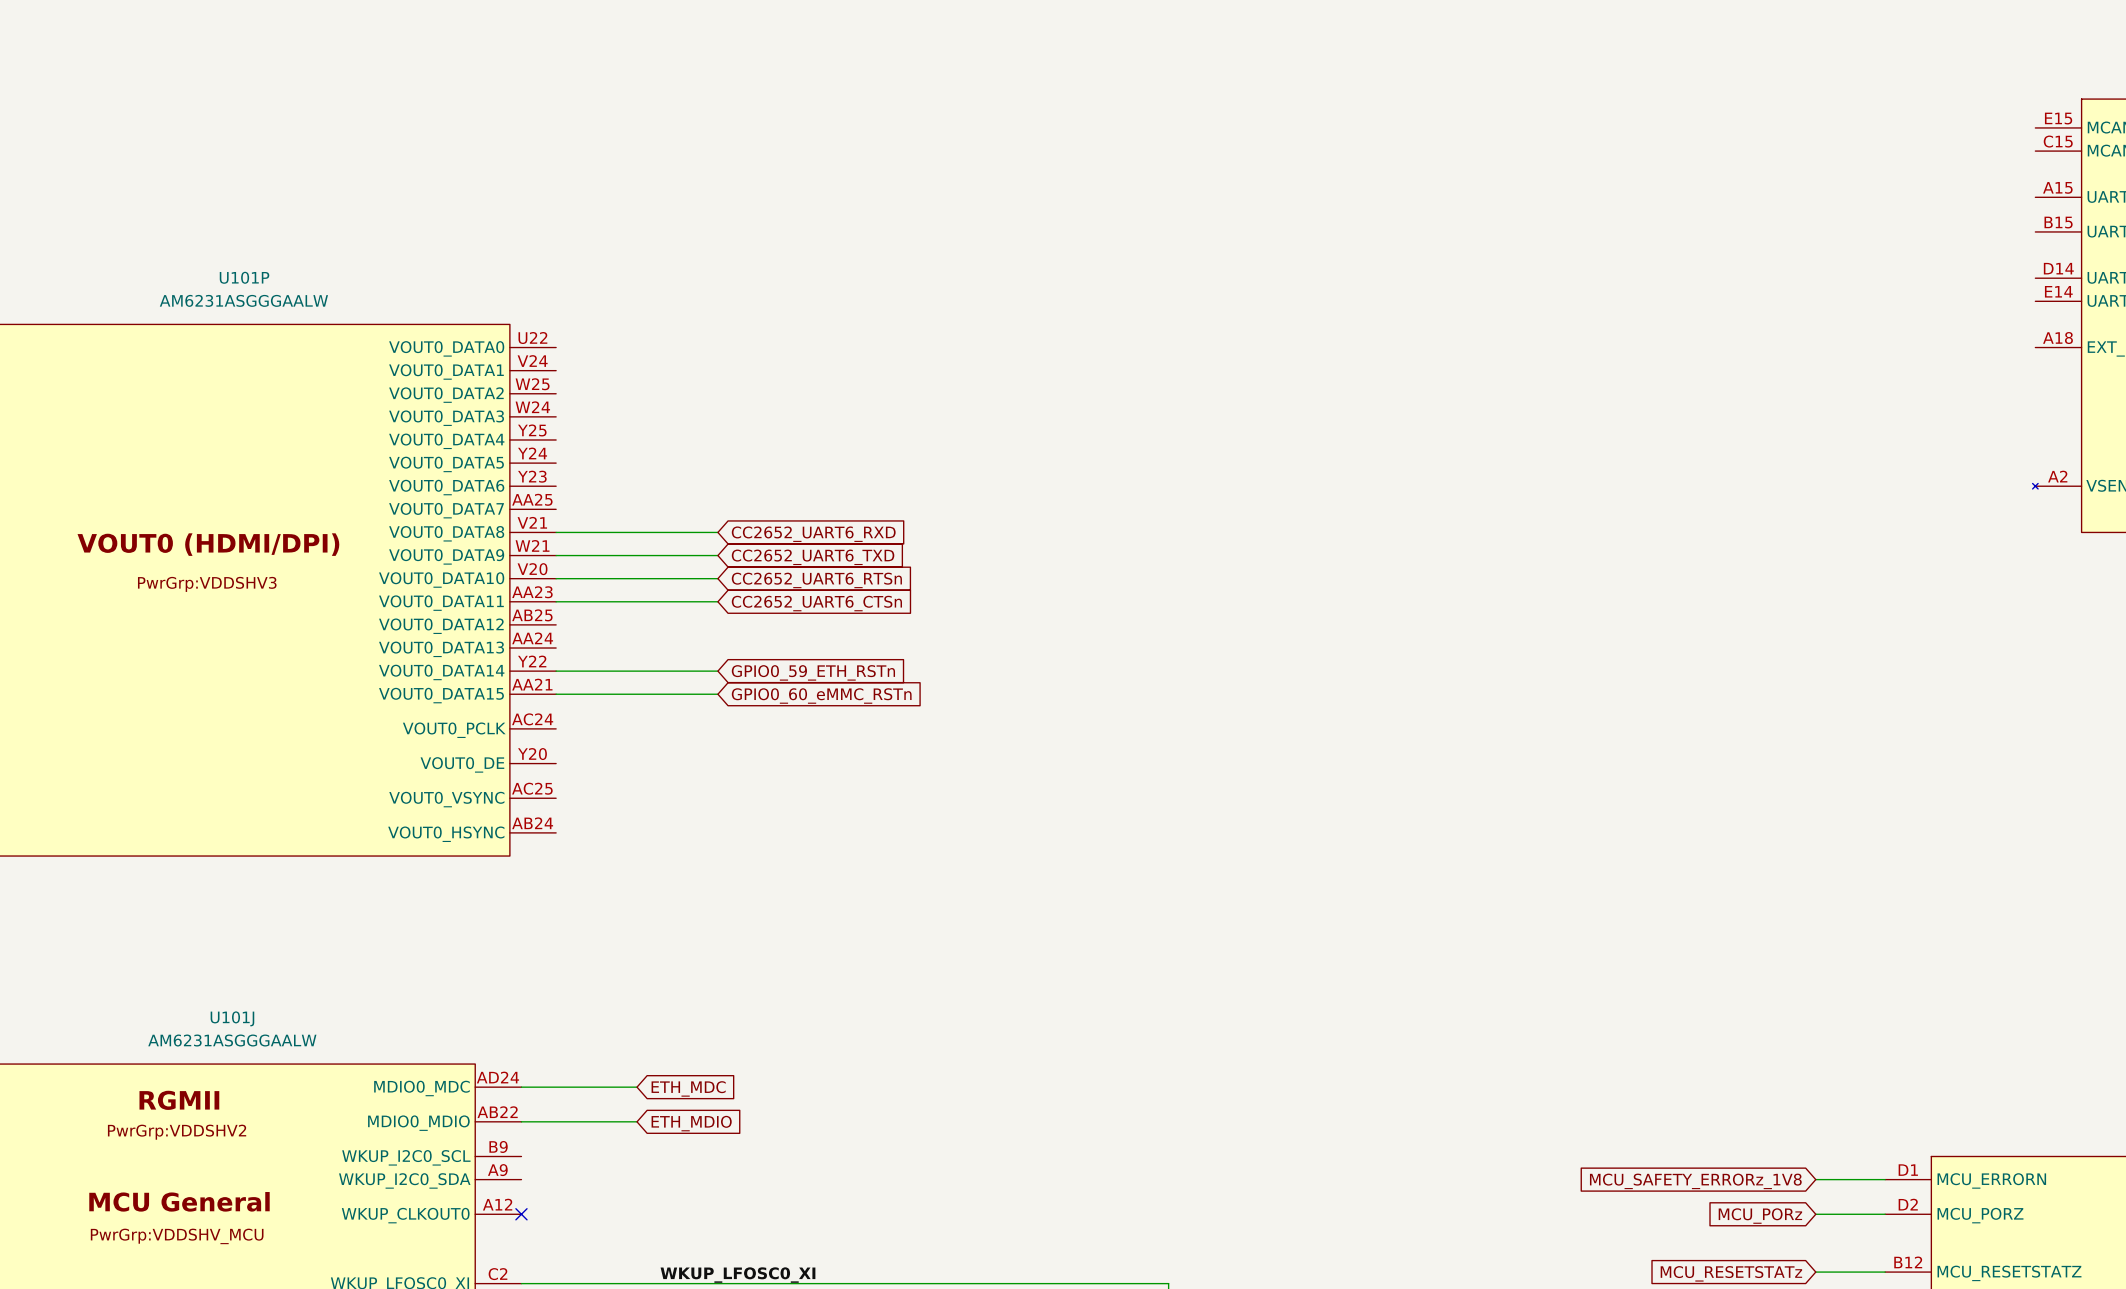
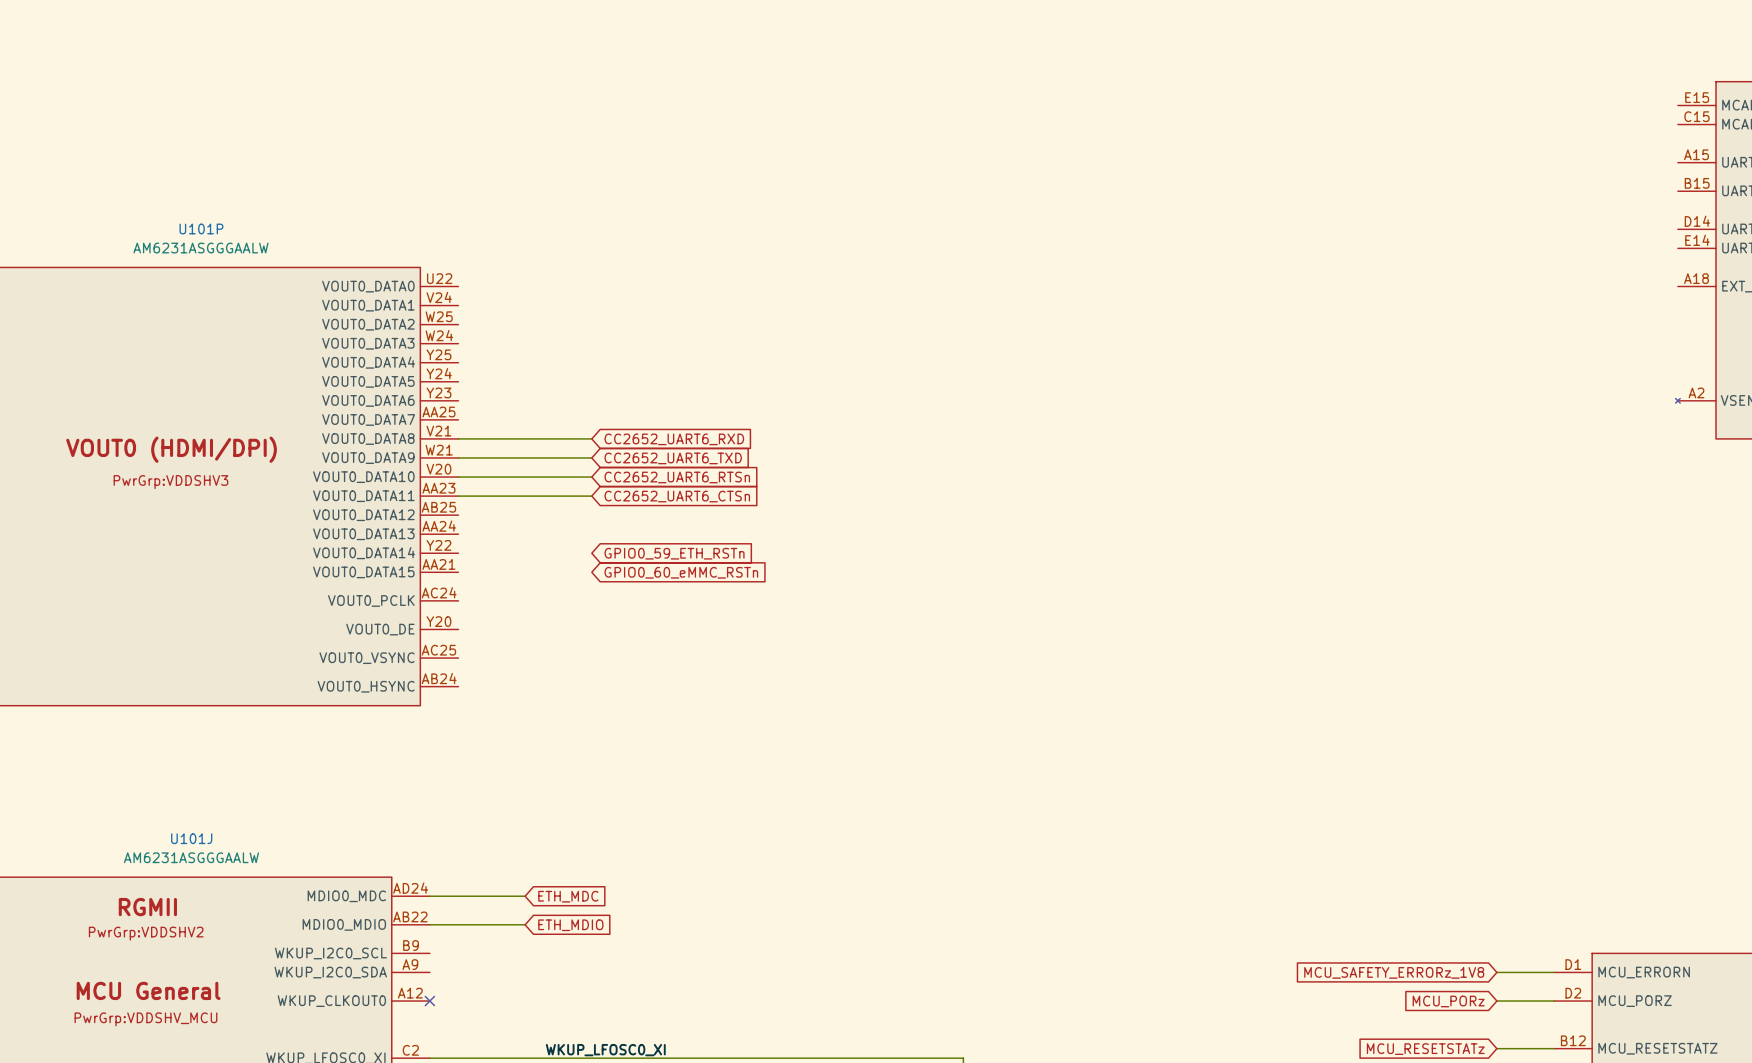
wire: (556, 671) (717, 671) -> none
wire: (556, 694) (717, 694) -> none

